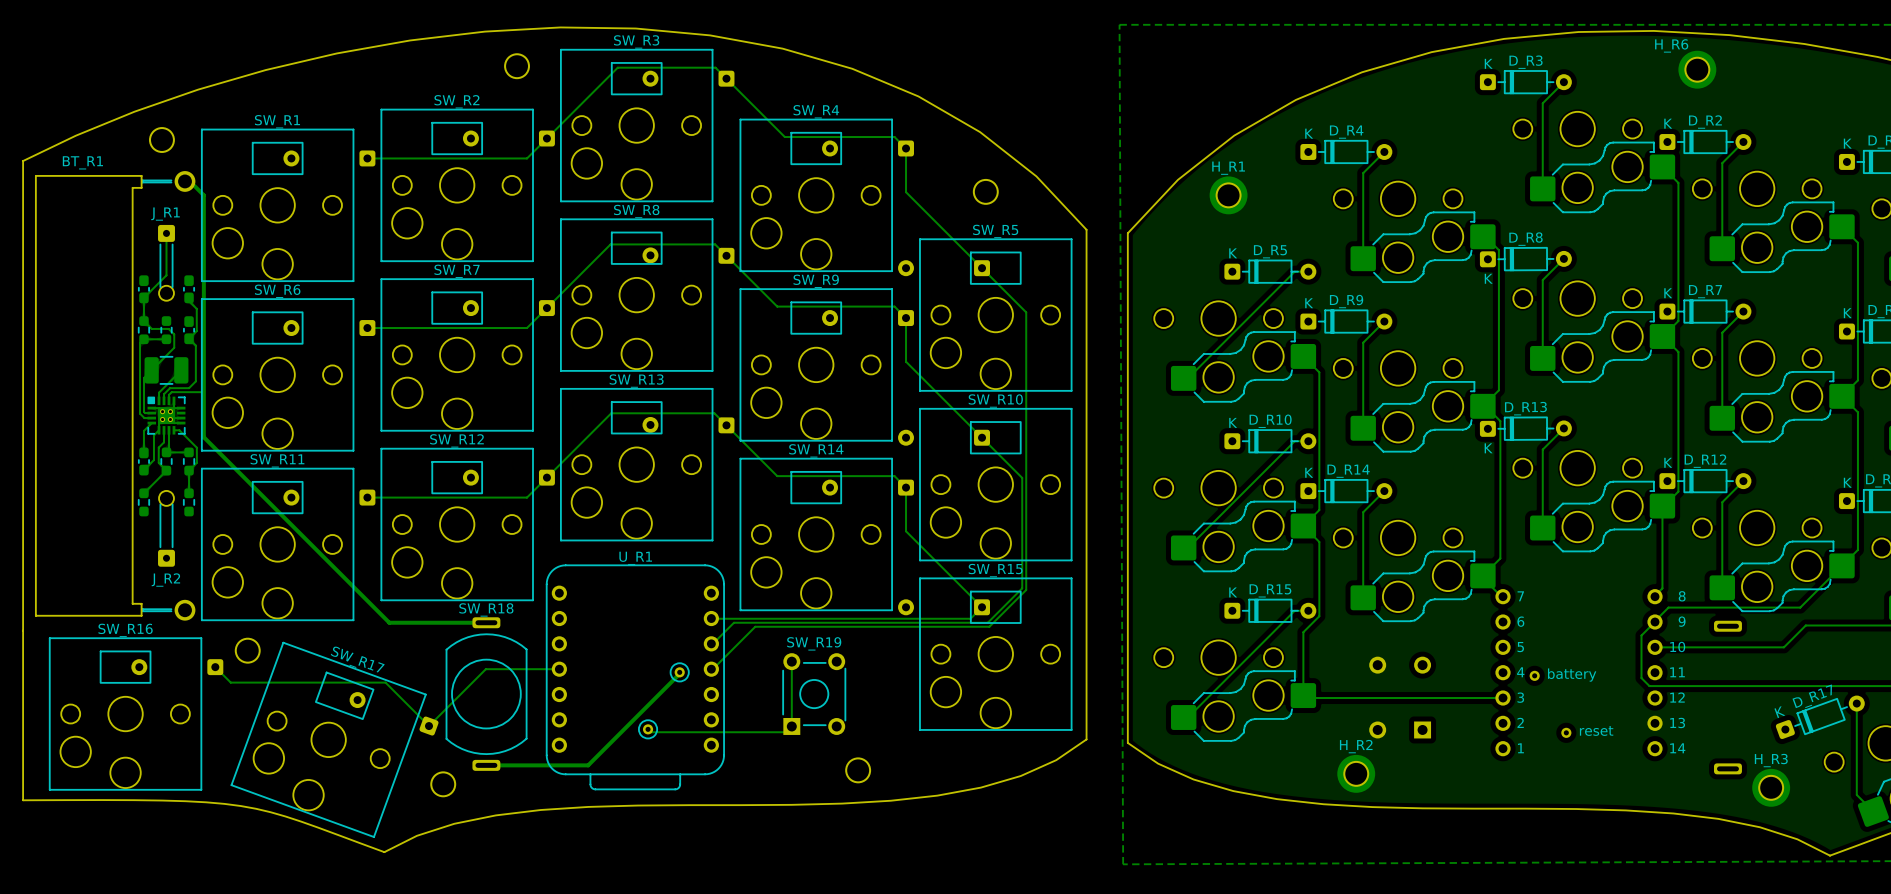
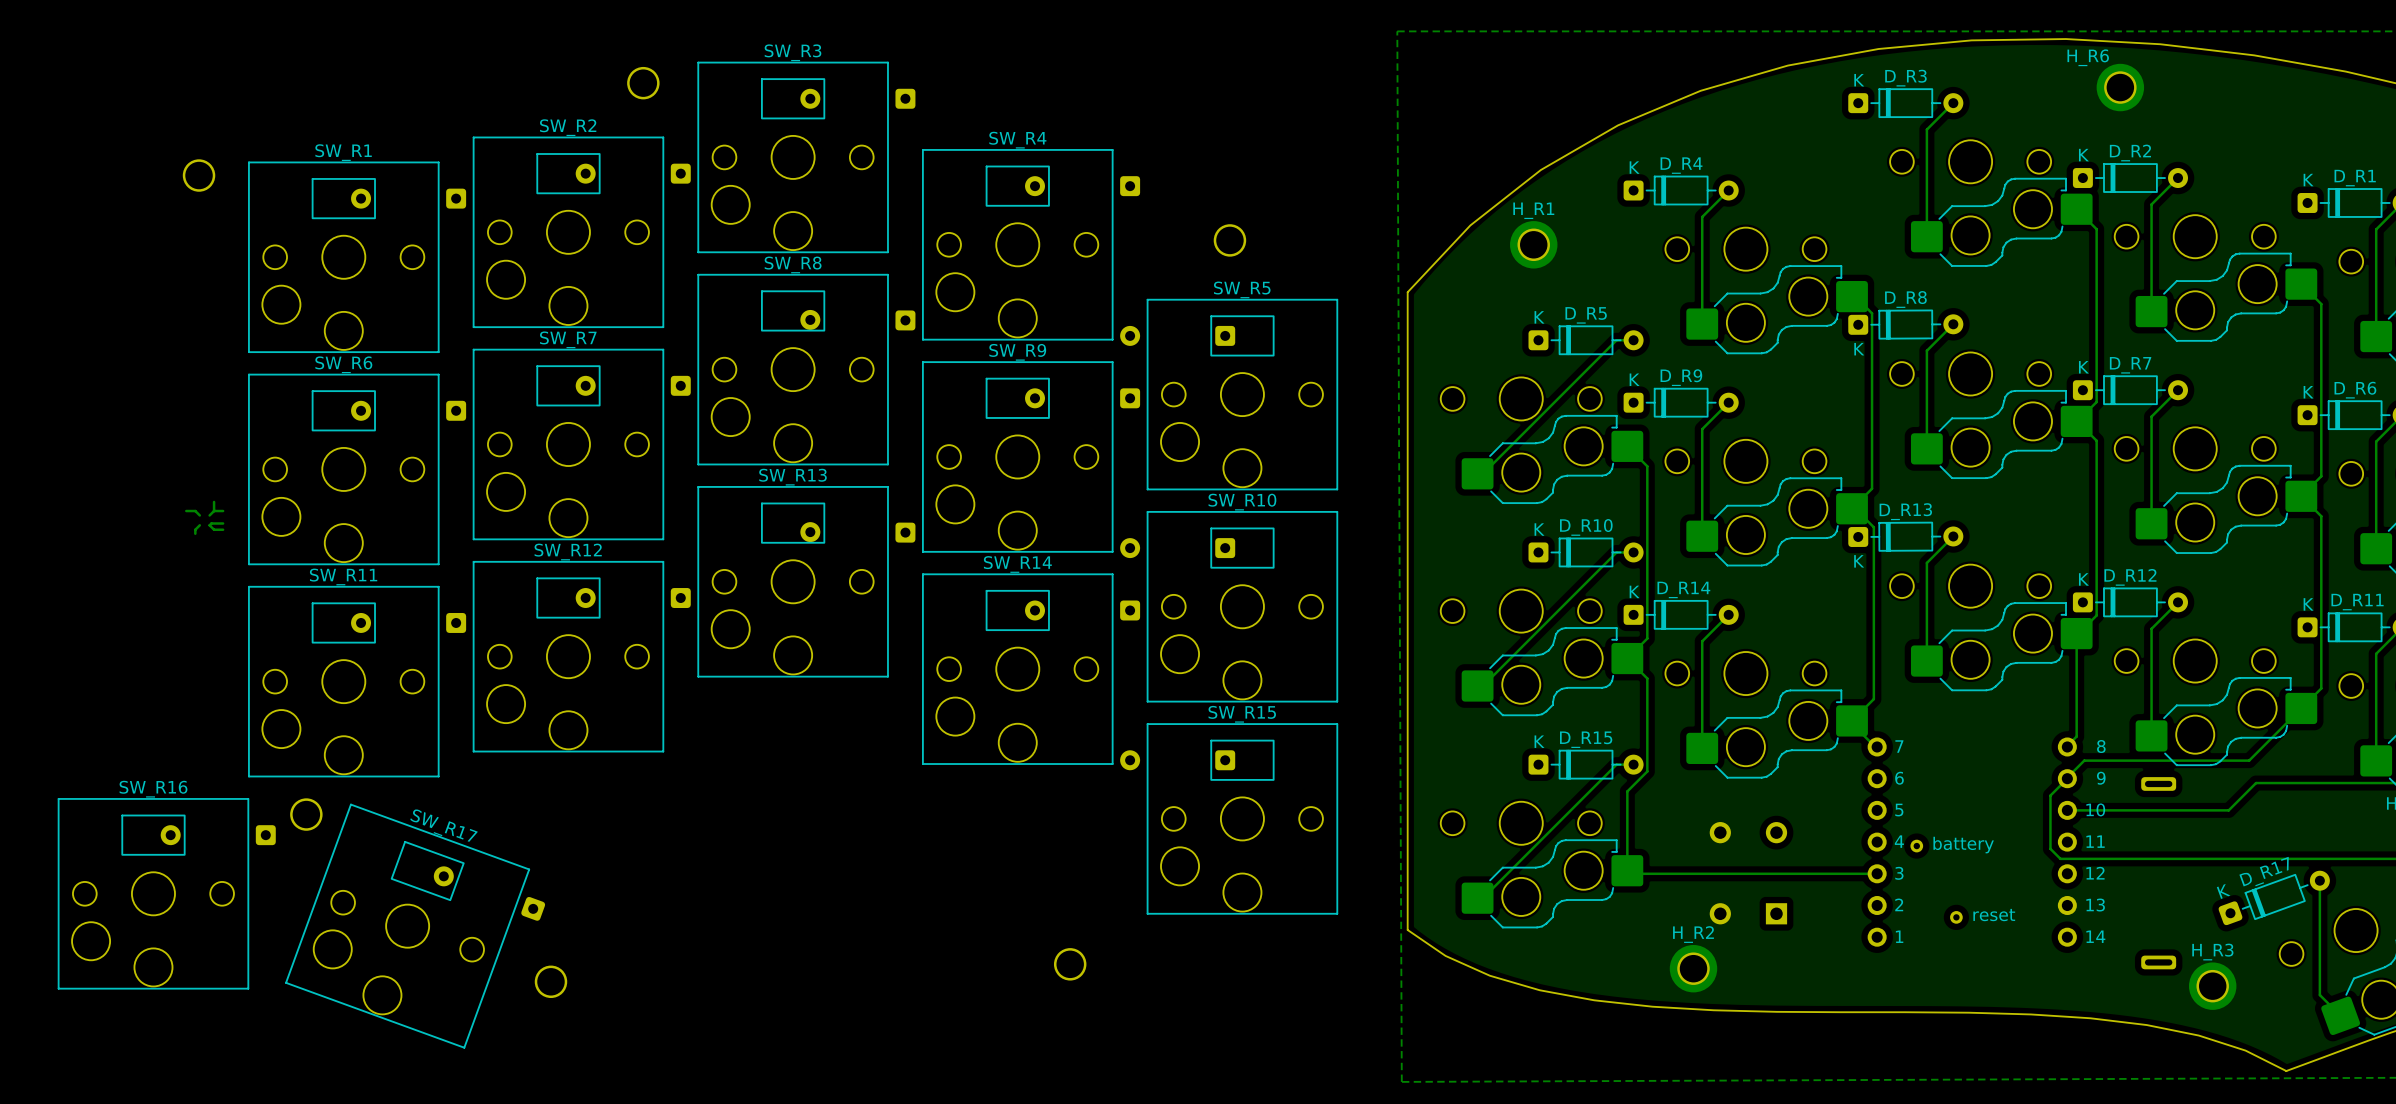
track: (367, 158) (527, 158) (617, 67) (715, 67) (784, 137) (894, 137) (906, 148) (906, 192) (1026, 312) (1026, 589) (989, 626) (755, 626) (712, 669) -> none
board edge: (23, 161) (23, 800) (161, 800) (240, 806) (285, 816) (384, 852) (416, 835) (454, 823) (495, 815) (540, 809) (638, 805) (842, 803) (937, 795) (980, 787) (1020, 775) (1056, 760) (1086, 739) (1086, 229) (1036, 176) (980, 132) (918, 96) (852, 68) (782, 48) (710, 35) (635, 28) (560, 27) (484, 31) (410, 40) (336, 53) (265, 70) (198, 89) (134, 111) (75, 135) (23, 161) -> none
track: (185, 176) (203, 195) (203, 437) (389, 622) (486, 622) -> none
track: (166, 233) (166, 275) (143, 297) (143, 321) (151, 328) (168, 328) (174, 334) (174, 347) (144, 378) (144, 411) (151, 413) -> none
J_R1: (166, 262) -> none
part: (143, 289) -> none
part: (189, 289) -> none
track: (186, 298) (196, 308) (196, 331) (189, 338) (195, 345) (195, 381) (189, 388) (170, 388) (164, 394) (164, 400) -> none
track: (367, 328) (527, 328) (610, 244) (715, 244) (777, 306) (894, 306) (906, 318) (906, 361) (1022, 477) (1022, 588) (987, 622) (733, 622) (712, 644) -> none
part: (143, 330) -> none
part: (166, 330) -> none
part: (189, 330) -> none
track: (166, 339) (143, 339) (140, 343) (140, 413) (144, 418) (151, 418) -> none
part: (166, 370) -> none
track: (181, 370) (159, 392) (159, 400) -> none
track: (203, 392) (171, 392) (168, 394) (168, 400) -> none
BT_R1: (115, 395) -> none
part: (166, 415) -> none
track: (151, 423) (143, 430) (143, 452) -> none
track: (159, 430) (153, 435) (153, 460) (143, 470) -> none
track: (164, 430) (164, 442) (158, 447) (158, 462) (166, 470) -> none
track: (168, 430) (168, 449) (166, 452) (189, 452) -> none
track: (173, 430) (179, 430) (196, 447) (196, 462) (189, 470) (189, 493) -> none
part: (143, 461) -> none
part: (166, 461) -> none
part: (189, 461) -> none
track: (166, 470) (143, 493) -> none
track: (367, 497) (527, 497) (611, 413) (714, 413) (777, 476) (894, 476) (906, 487) (906, 531) (982, 607) (970, 618) (712, 618) -> none
part: (143, 502) -> none
part: (189, 502) -> none
J_R2: (166, 528) -> none
track: (791, 661) (791, 726) (786, 732) (650, 732) (648, 729) -> none
track: (215, 667) (230, 682) (385, 682) (429, 726) (485, 669) (559, 669) -> none
track: (679, 672) (588, 765) (486, 765) -> none
U_R1: (635, 677) -> none
SW_R18: (486, 694) -> none
SW_R19: (814, 694) -> none

